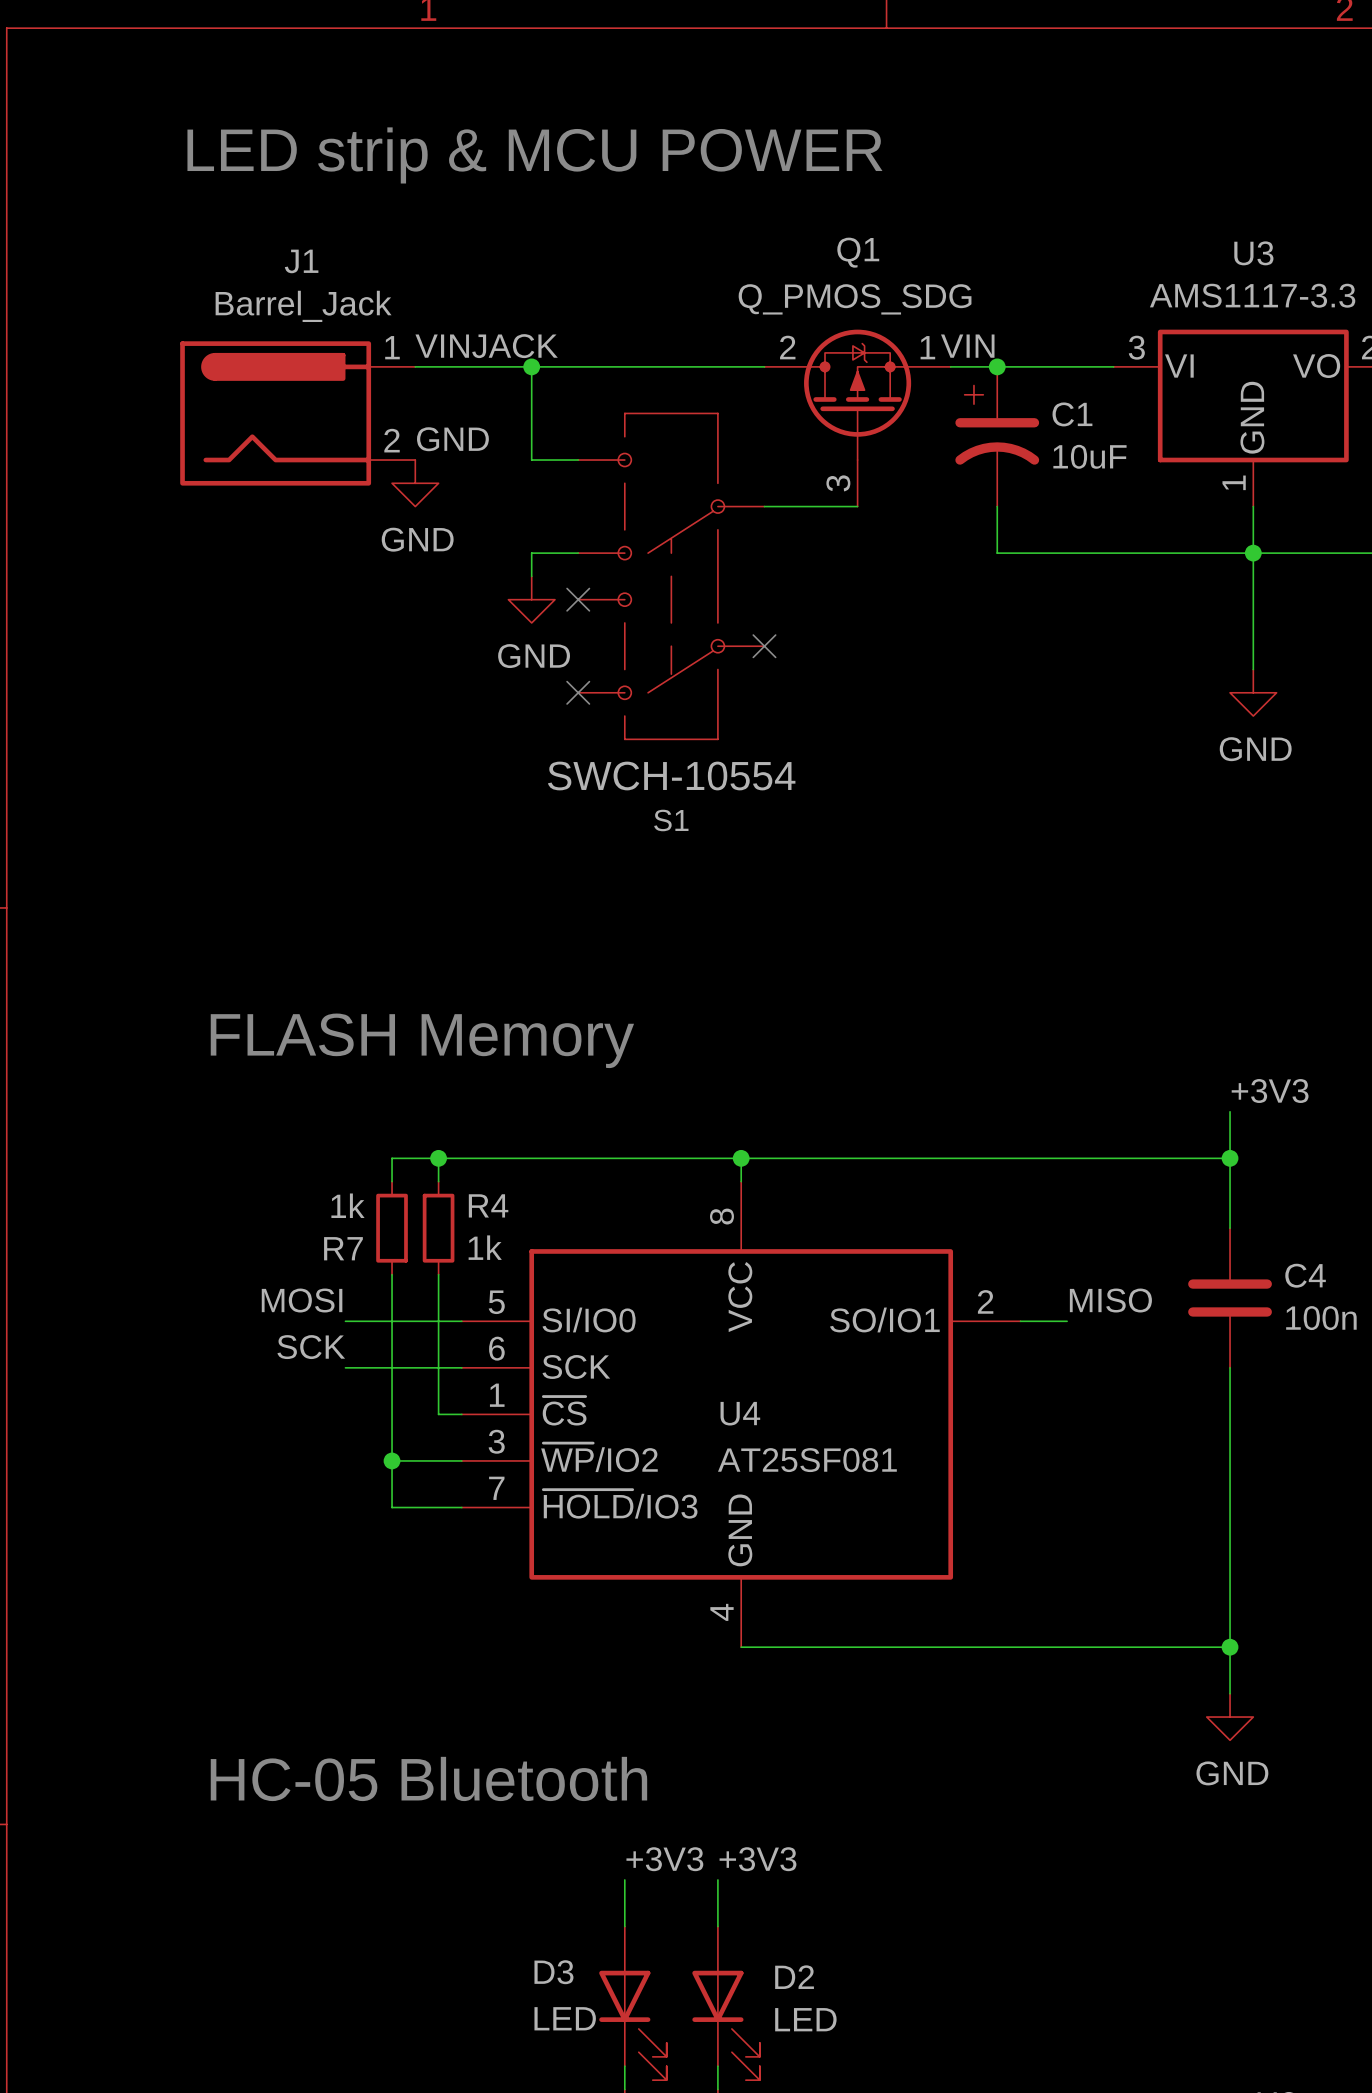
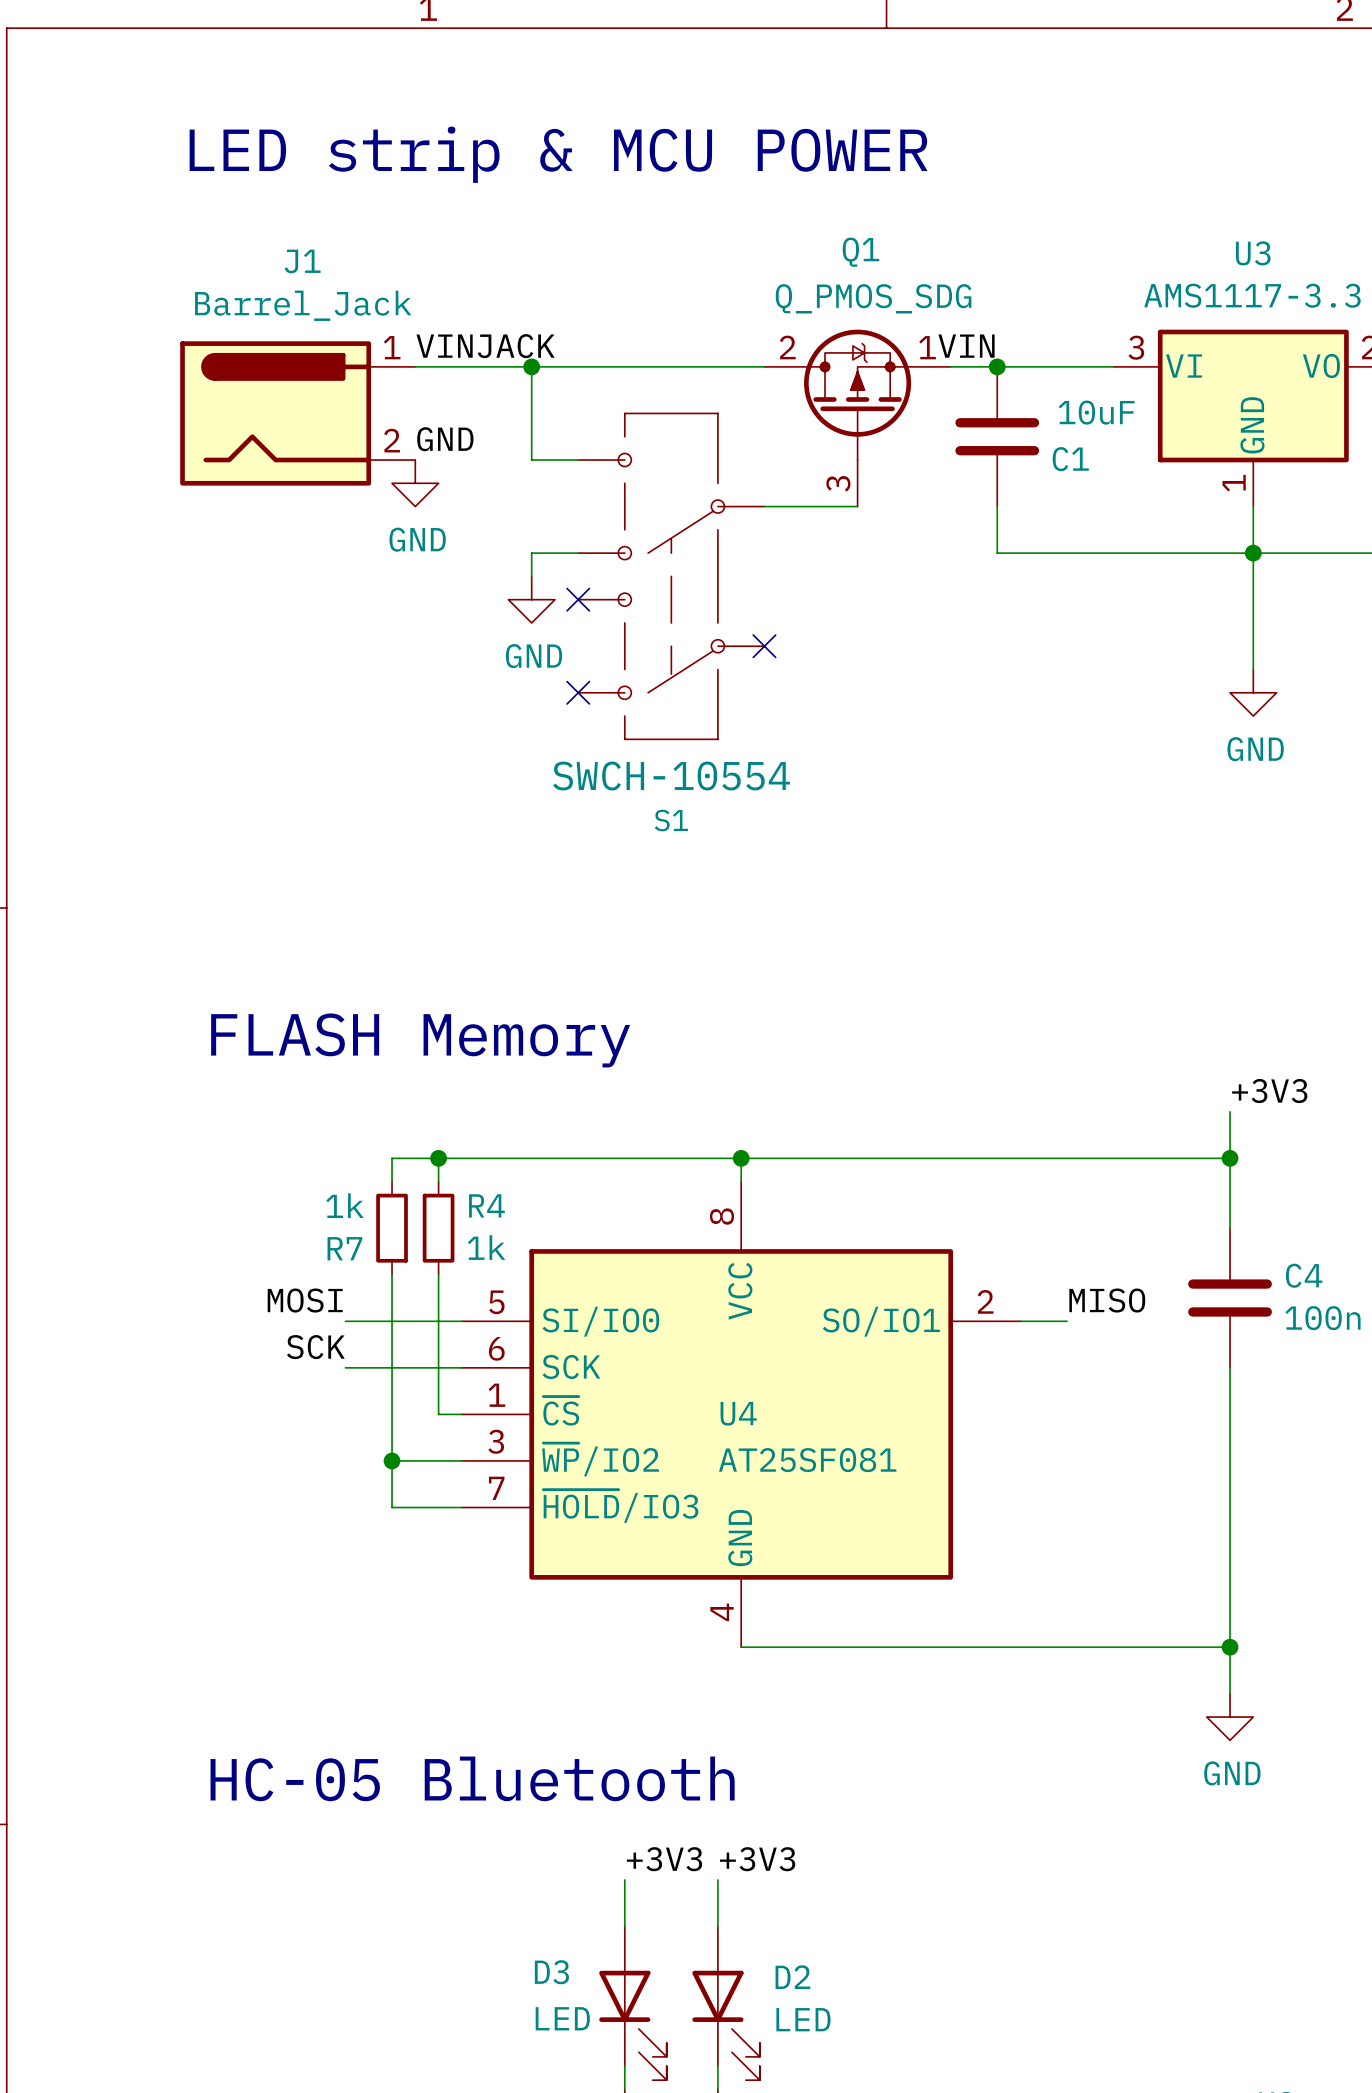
C1 symbol: [955, 366, 1040, 507] -> [955, 366, 1040, 507]
C1 name position: C1 (1072, 414) -> C1 (1070, 459)
C1 value position: 10uF (1089, 456) -> 10uF (1096, 412)

